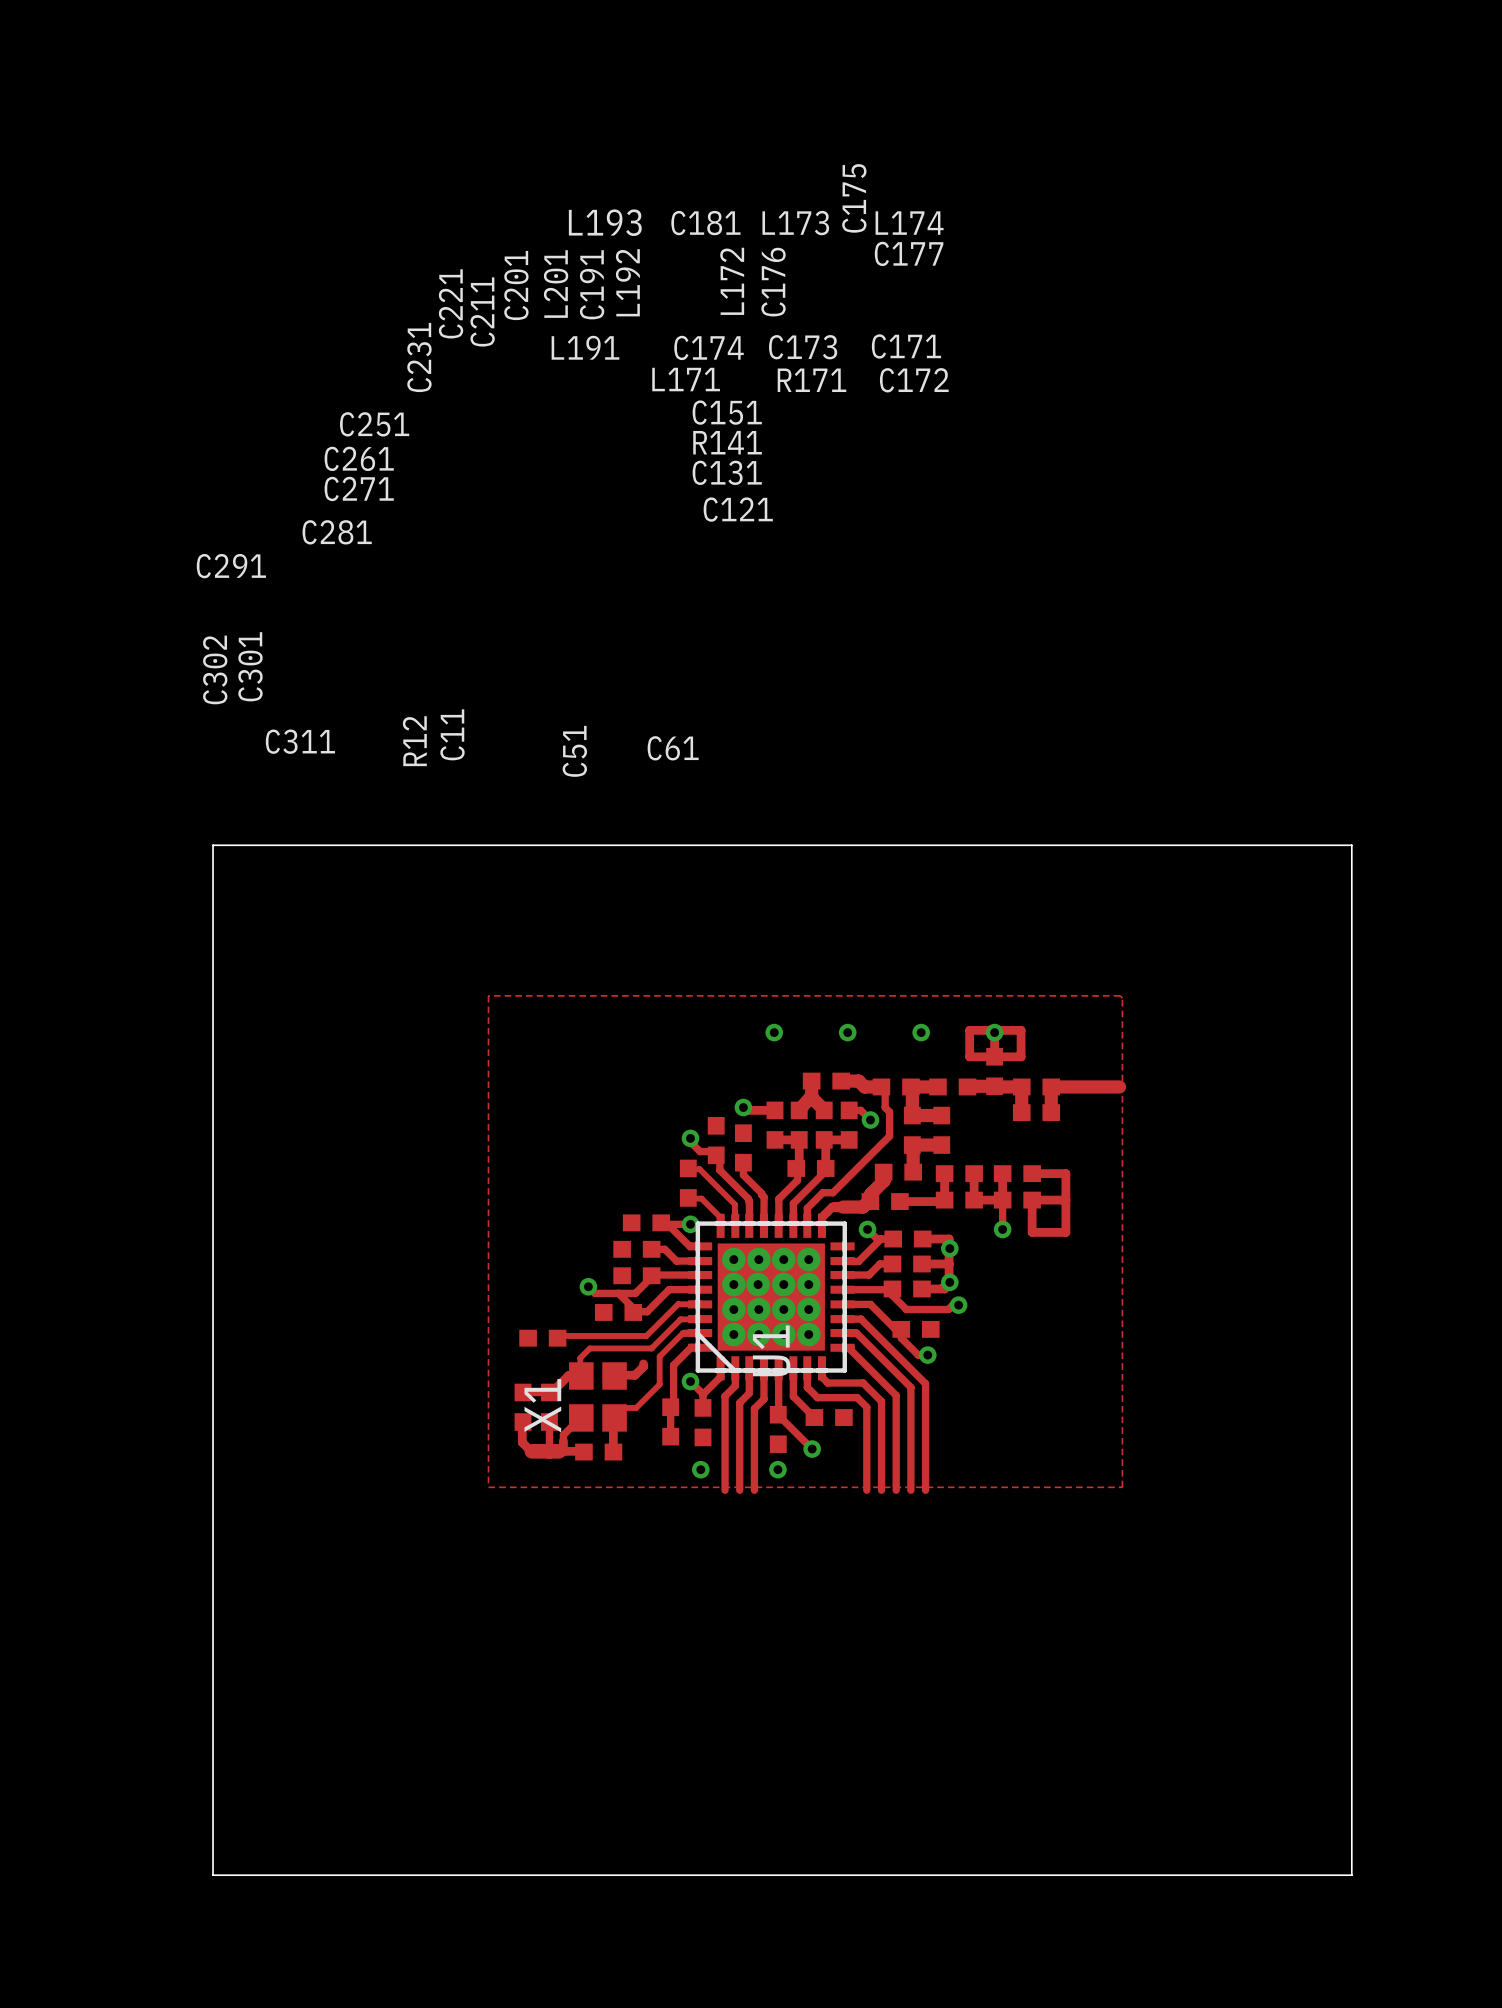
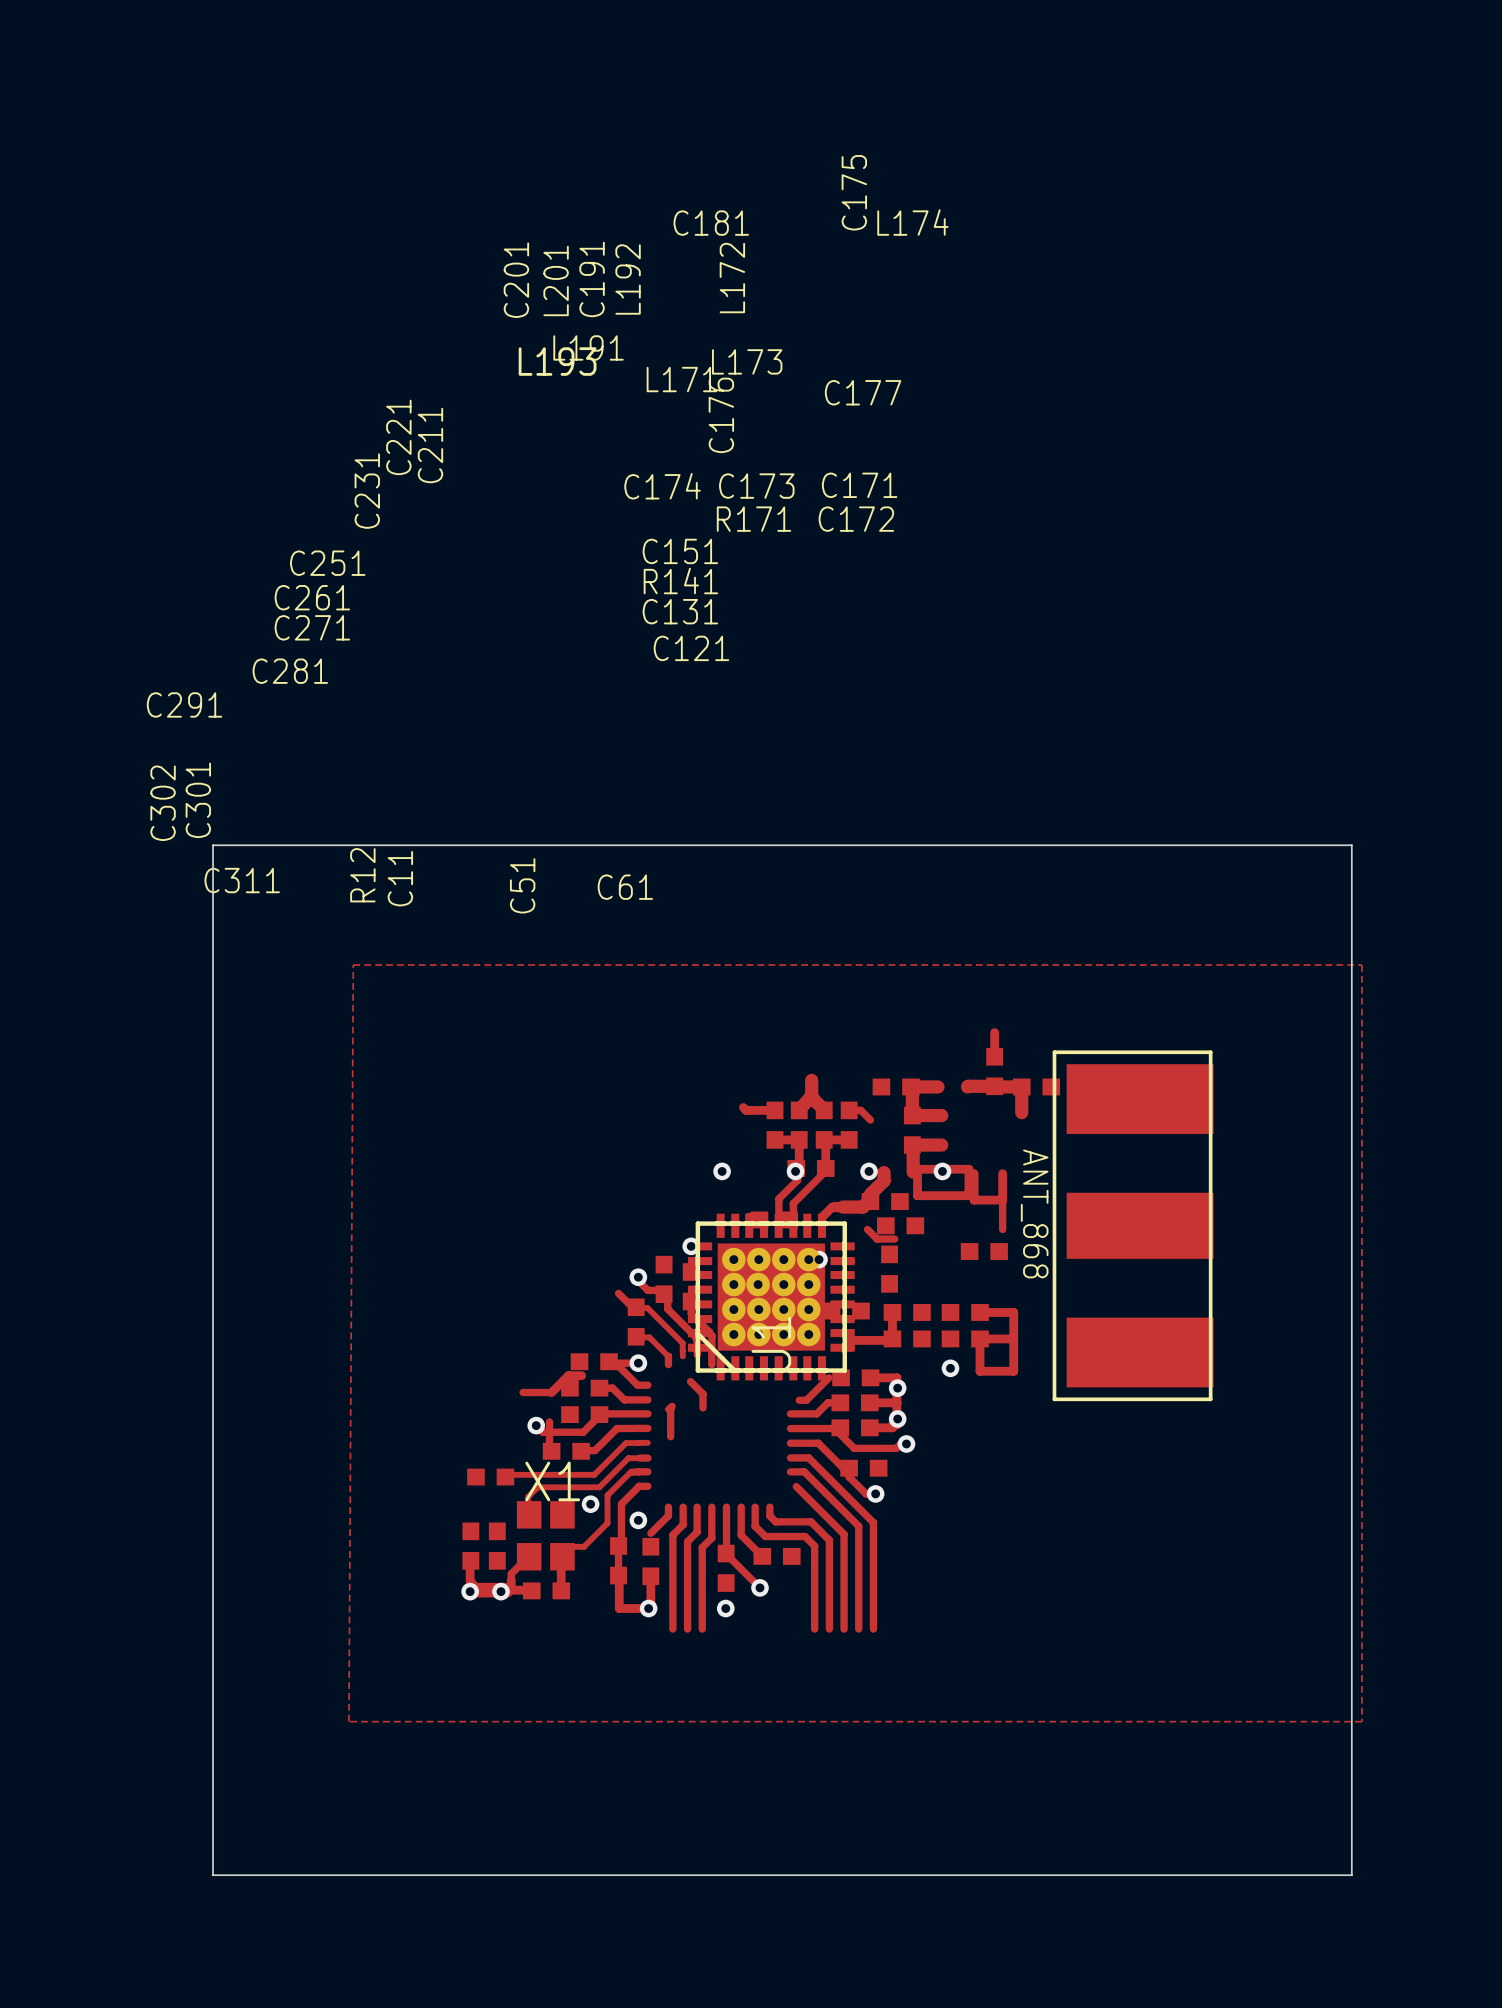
zone outline: none -> (353, 965) (348, 1721) (1361, 1721) (1361, 965) (353, 965)
zone outline: (488, 995) (488, 1487) (1122, 1487) (1122, 998) (1120, 995) (488, 995) -> none
track: (969, 1030) (969, 1056) (1021, 1056) (1021, 1030) (969, 1030) -> (917, 1169) (917, 1195) (968, 1195) (968, 1169) (917, 1169)
via: (774, 1032) -> none
via: (847, 1032) -> none
via: (921, 1032) -> none
via: (994, 1032) -> none
L193 position: (826, 1081) -> (774, 1219)
track: (841, 1081) (858, 1081) (864, 1086) (881, 1086) (880, 1087) (885, 1092) (885, 1107) (889, 1111) (889, 1136) (832, 1192) (822, 1192) (807, 1208) (807, 1225) -> none
L173 position: (952, 1086) -> (900, 1225)
track: (1119, 1086) (1051, 1086) (1051, 1112) -> none
via: (743, 1107) -> none
C177 position: (1036, 1112) -> (984, 1251)
via: (870, 1120) -> none
C176 position: (941, 1130) -> (889, 1269)
track: (690, 1138) (690, 1142) (700, 1151) (712, 1151) (716, 1155) (719, 1154) (719, 1170) (748, 1198) (749, 1216) -> (638, 1277) (638, 1280) (647, 1290) (660, 1290) (664, 1294) (667, 1293) (667, 1309) (696, 1337) (697, 1354)
via: (690, 1138) -> none
C221 position: (716, 1140) -> (664, 1279)
C211 position: (743, 1147) -> (691, 1286)
track: (743, 1161) (743, 1175) (764, 1197) (763, 1225) -> (691, 1300) (691, 1313) (711, 1336) (711, 1364)
track: (688, 1169) (699, 1169) (734, 1204) (735, 1217) -> (636, 1308) (647, 1308) (682, 1343) (682, 1356)
via: none -> (722, 1171)
via: none -> (795, 1171)
via: none -> (869, 1171)
via: none -> (942, 1171)
C174 position: (898, 1172) -> (846, 1311)
track: (944, 1173) (944, 1201) (899, 1201) -> (892, 1312) (892, 1340) (847, 1340)
C173 position: (959, 1173) -> (907, 1312)
C171 position: (1017, 1173) -> (965, 1312)
track: (1032, 1173) (1065, 1173) (1065, 1232) (1032, 1232) (1032, 1200) -> (980, 1312) (1013, 1312) (1013, 1371) (980, 1371) (980, 1338)
C231 position: (688, 1183) -> (636, 1322)
track: (688, 1197) (701, 1198) (720, 1217) (720, 1225) -> none
R171 position: (959, 1200) -> (907, 1338)
C172 position: (1017, 1200) -> (965, 1338)
track: (1031, 1200) (1065, 1200) -> (979, 1338) (1013, 1338)
C251 position: (646, 1222) -> (594, 1361)
track: (690, 1224) (662, 1224) (661, 1222) (666, 1222) (689, 1246) (700, 1246) -> (638, 1363) (610, 1363) (609, 1361) (614, 1361) (637, 1385) (647, 1385)
via position: (690, 1224) -> (691, 1246)
ANT_868: none -> (1133, 1225)
via: (867, 1229) -> none
via: (1002, 1229) -> none
track: (881, 1239) (858, 1261) (851, 1261) -> (828, 1377) (806, 1400) (799, 1400)
C151 position: (907, 1239) -> (855, 1377)
track: (922, 1239) (949, 1239) (949, 1286) (944, 1286) (944, 1288) (921, 1288) -> (870, 1377) (896, 1377) (896, 1424) (892, 1424) (892, 1427) (869, 1427)
via: (949, 1248) -> none
C261 position: (636, 1249) -> (584, 1388)
track: (651, 1249) (664, 1249) (676, 1261) (700, 1261) -> (599, 1388) (612, 1388) (624, 1399) (647, 1399)
via: none -> (819, 1259)
track: (892, 1264) (880, 1264) (869, 1275) (842, 1275) -> (840, 1402) (827, 1402) (816, 1413) (790, 1413)
R141 position: (907, 1264) -> (855, 1402)
track: (921, 1264) (949, 1264) -> (869, 1402) (896, 1402)
C271 position: (636, 1275) -> (584, 1414)
track: (700, 1275) (651, 1275) (651, 1277) -> none
via: none -> (638, 1277)
track: (651, 1277) (635, 1293) (595, 1293) (588, 1286) -> none
via: (949, 1282) -> none
via: (588, 1286) -> none
C131 position: (907, 1288) -> (855, 1427)
track: (700, 1289) (669, 1289) (647, 1311) (633, 1311) -> (647, 1428) (616, 1428) (595, 1450) (581, 1450)
track: (842, 1289) (891, 1289) (892, 1288) (891, 1294) (906, 1309) (948, 1309) (952, 1305) (958, 1305) -> (790, 1428) (839, 1428) (840, 1427) (838, 1432) (854, 1448) (896, 1448) (900, 1443) (906, 1443)
track: (700, 1304) (678, 1304) (646, 1335) (559, 1335) (557, 1338) -> (647, 1442) (626, 1443) (594, 1474) (507, 1474) (505, 1477)
track: (842, 1304) (870, 1304) (895, 1329) (901, 1329) (901, 1338) (918, 1355) (927, 1355) -> (790, 1443) (818, 1443) (843, 1468) (849, 1468) (849, 1477) (866, 1493) (875, 1493)
via: (958, 1305) -> none
C281 position: (618, 1312) -> (566, 1451)
track: (700, 1319) (680, 1319) (651, 1348) (589, 1348) (580, 1358) (580, 1375) -> (647, 1458) (628, 1458) (599, 1487) (537, 1487) (528, 1496) (528, 1514)
track: (842, 1319) (860, 1319) (925, 1383) (925, 1490) -> (790, 1457) (808, 1457) (873, 1522) (873, 1629)
C121 position: (916, 1329) -> (863, 1468)
track: (700, 1332) (682, 1333) (659, 1356) (659, 1384) (636, 1407) (614, 1407) (613, 1452) -> (647, 1471) (630, 1472) (607, 1495) (607, 1523) (583, 1546) (562, 1546) (561, 1590)
track: (842, 1333) (856, 1333) (910, 1387) (910, 1490) -> (790, 1471) (804, 1471) (858, 1526) (858, 1629)
track: none -> (636, 1336) (649, 1337) (668, 1356)
C291 position: (542, 1338) -> (490, 1477)
track: (700, 1347) (691, 1347) (673, 1365) (673, 1406) (670, 1406) -> (647, 1486) (639, 1486) (621, 1504) (621, 1545) (618, 1545)
track: (848, 1347) (896, 1395) (896, 1490) -> (796, 1486) (844, 1534) (844, 1629)
via: (927, 1355) -> none
track: none -> (668, 1356) (668, 1364)
via: none -> (638, 1363)
track: (643, 1363) (643, 1366) (635, 1375) (614, 1375) -> none
track: (720, 1368) (720, 1376) (703, 1394) -> (668, 1507) (668, 1515) (650, 1533)
track: (735, 1368) (735, 1385) (725, 1396) (725, 1490) -> (683, 1507) (683, 1524) (672, 1535) (672, 1629)
track: (749, 1368) (749, 1393) (739, 1402) (739, 1490) -> (697, 1507) (697, 1532) (687, 1541) (687, 1629)
track: (763, 1368) (763, 1399) (754, 1408) (754, 1490) -> (711, 1507) (711, 1538) (702, 1547) (702, 1629)
track: (778, 1368) (778, 1414) -> (726, 1507) (726, 1553)
track: (793, 1368) (793, 1396) (814, 1417) -> (741, 1507) (741, 1535) (762, 1556)
track: (807, 1368) (807, 1387) (817, 1397) (857, 1397) (866, 1407) (866, 1490) -> (755, 1507) (755, 1526) (765, 1536) (805, 1536) (814, 1546) (814, 1629)
track: (822, 1368) (822, 1377) (827, 1383) (863, 1383) (881, 1401) (881, 1490) -> (769, 1507) (769, 1515) (775, 1521) (810, 1521) (829, 1540) (829, 1629)
via: none -> (950, 1368)
via: (690, 1381) -> none
via: none -> (897, 1388)
X1 position: (597, 1396) -> (545, 1535)
X1 name rotation: 0° (542, 1405) -> 90° clockwise (552, 1481)
X1 name position: X1 (542, 1405) -> X1 (552, 1481)
C302 position: (523, 1407) -> (470, 1546)
C301 position: (549, 1407) -> (497, 1546)
track: none -> (647, 1413) (599, 1413) (583, 1432) (542, 1432) (536, 1425)
track: (778, 1415) (812, 1449) -> (726, 1554) (760, 1587)
track: (581, 1417) (563, 1435) (563, 1451) -> (529, 1556) (511, 1573) (511, 1590)
C61 position: (829, 1417) -> (777, 1556)
via: none -> (897, 1419)
track: (522, 1421) (522, 1442) (531, 1451) (583, 1451) -> none
R12 position: (670, 1421) -> (618, 1560)
C11 position: (703, 1422) -> (650, 1561)
via: none -> (536, 1425)
C51 position: (778, 1429) -> (726, 1568)
via: none -> (906, 1443)
via: (812, 1449) -> none
C311 position: (598, 1452) -> (546, 1590)
via: (700, 1469) -> none
via: (777, 1469) -> none
via: none -> (875, 1493)
via: none -> (590, 1504)
via: none -> (638, 1520)
track: none -> (619, 1545) (616, 1548) (618, 1548) (619, 1608) (650, 1608) (650, 1576)
track: none -> (470, 1560) (470, 1581) (478, 1590) (531, 1590)
via: none -> (760, 1587)
via: none -> (470, 1591)
via: none -> (500, 1591)
via: none -> (648, 1608)
via: none -> (725, 1608)

